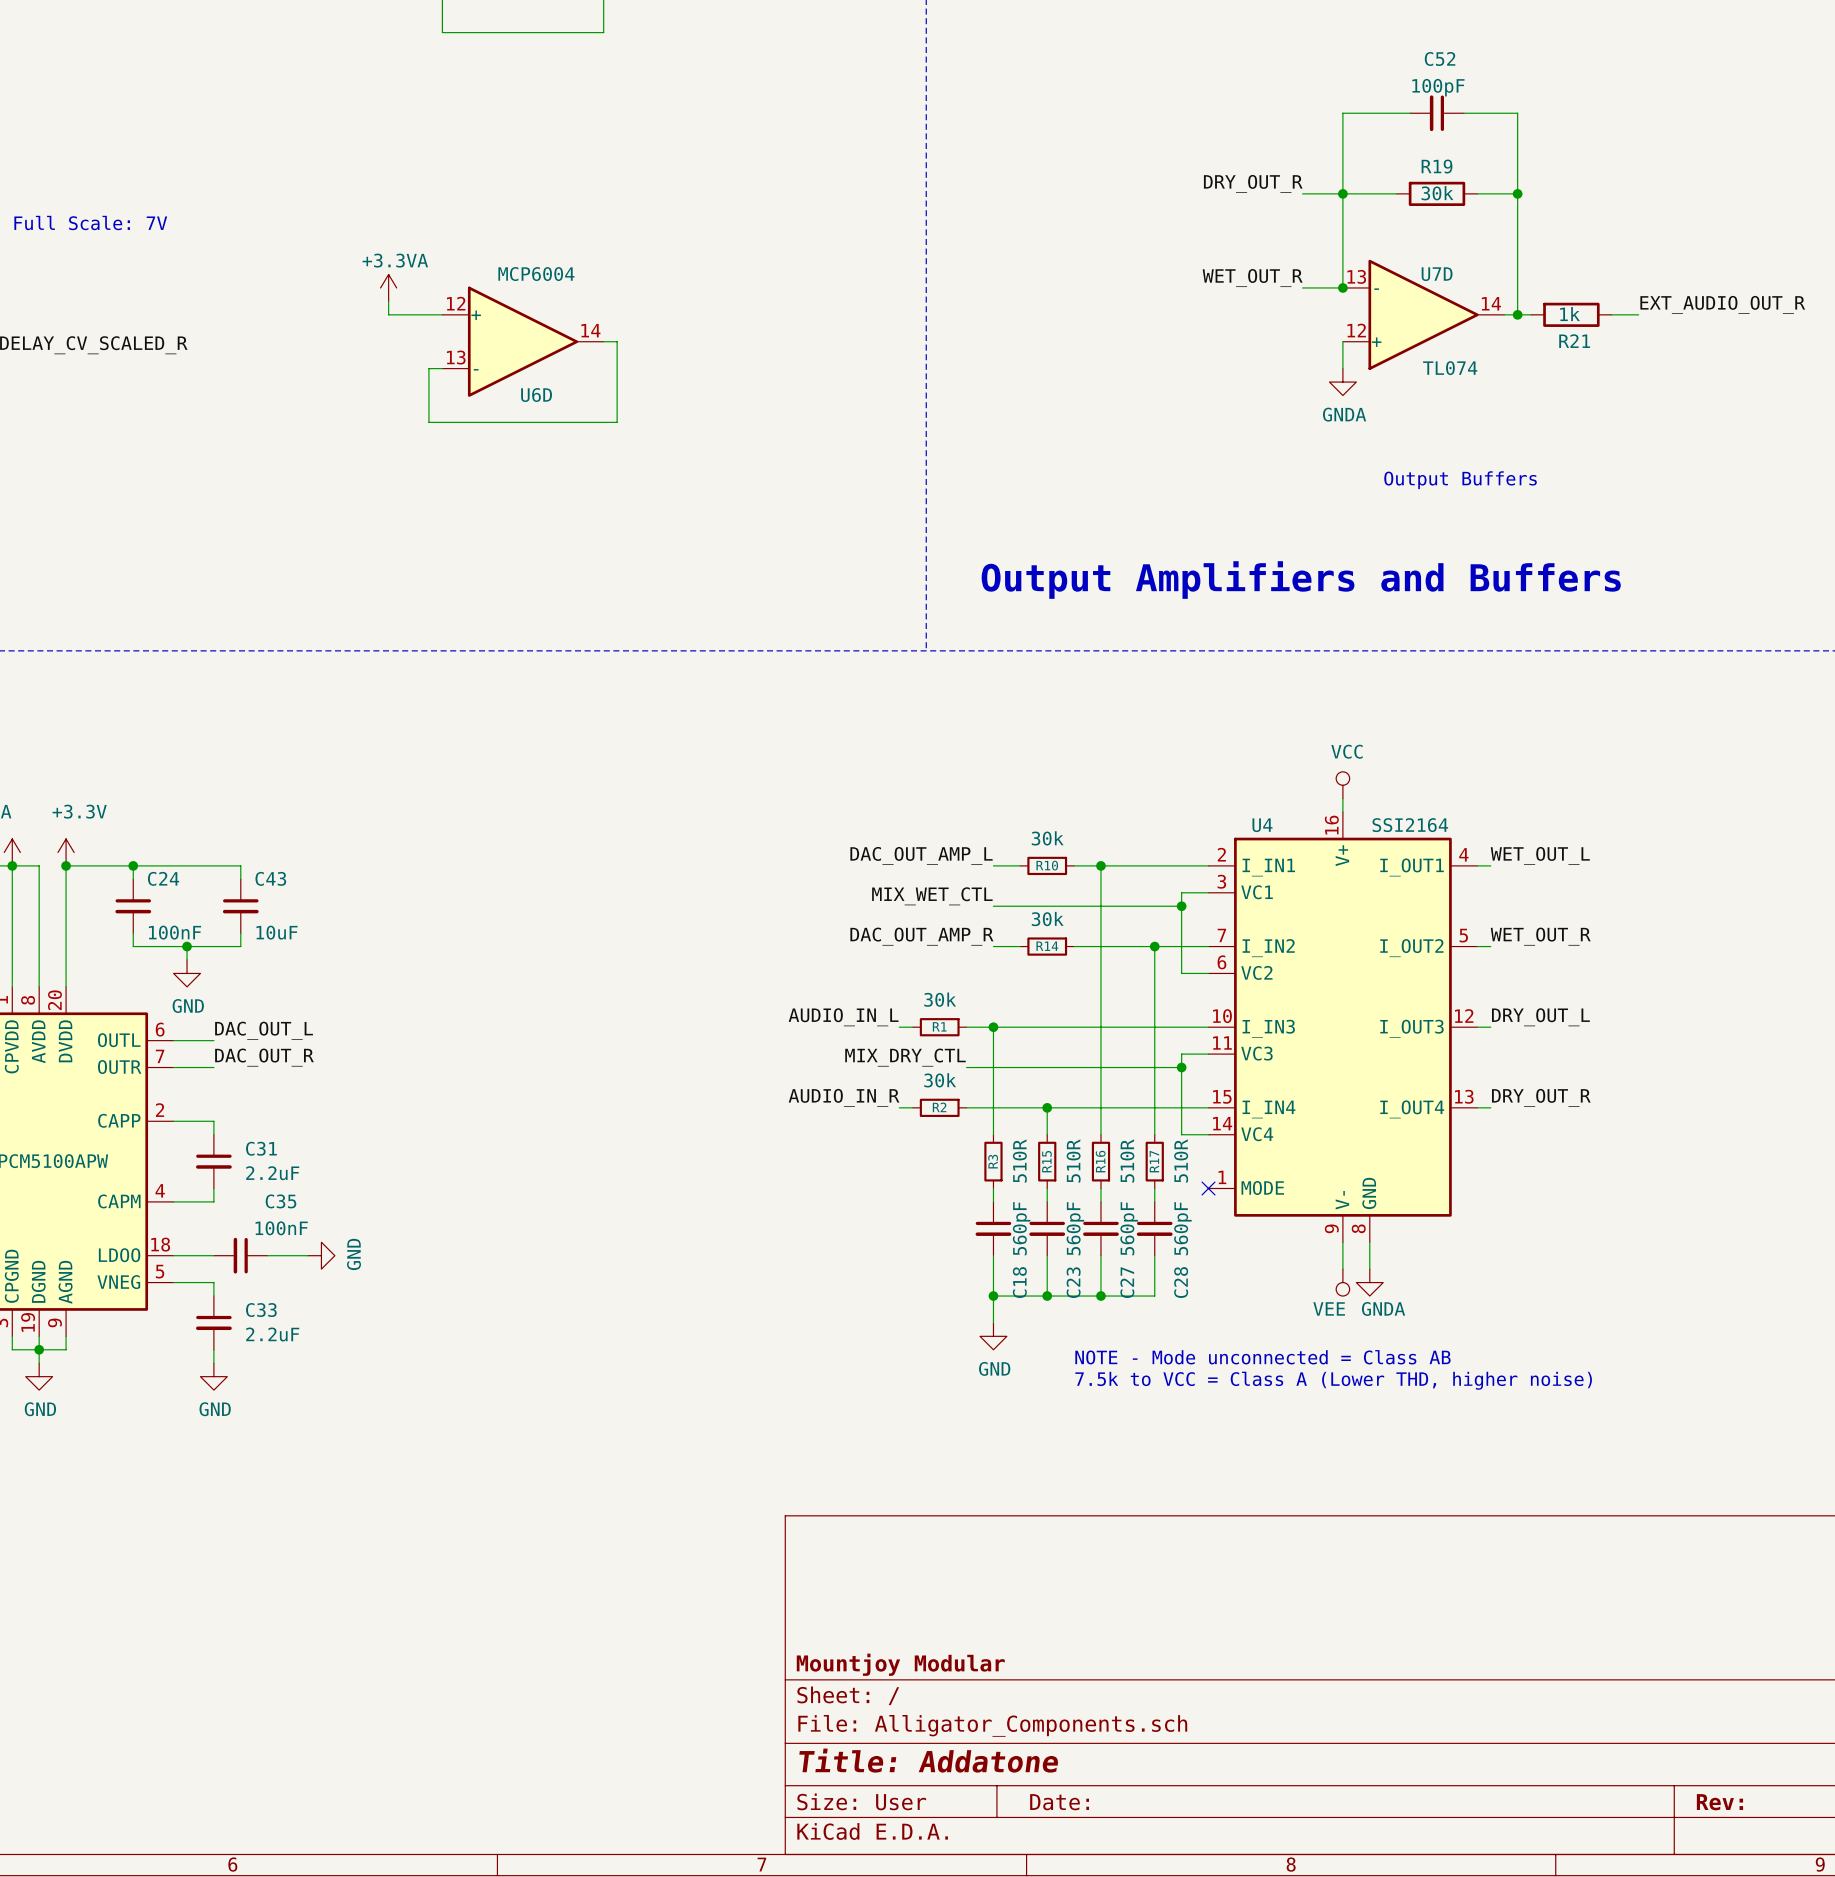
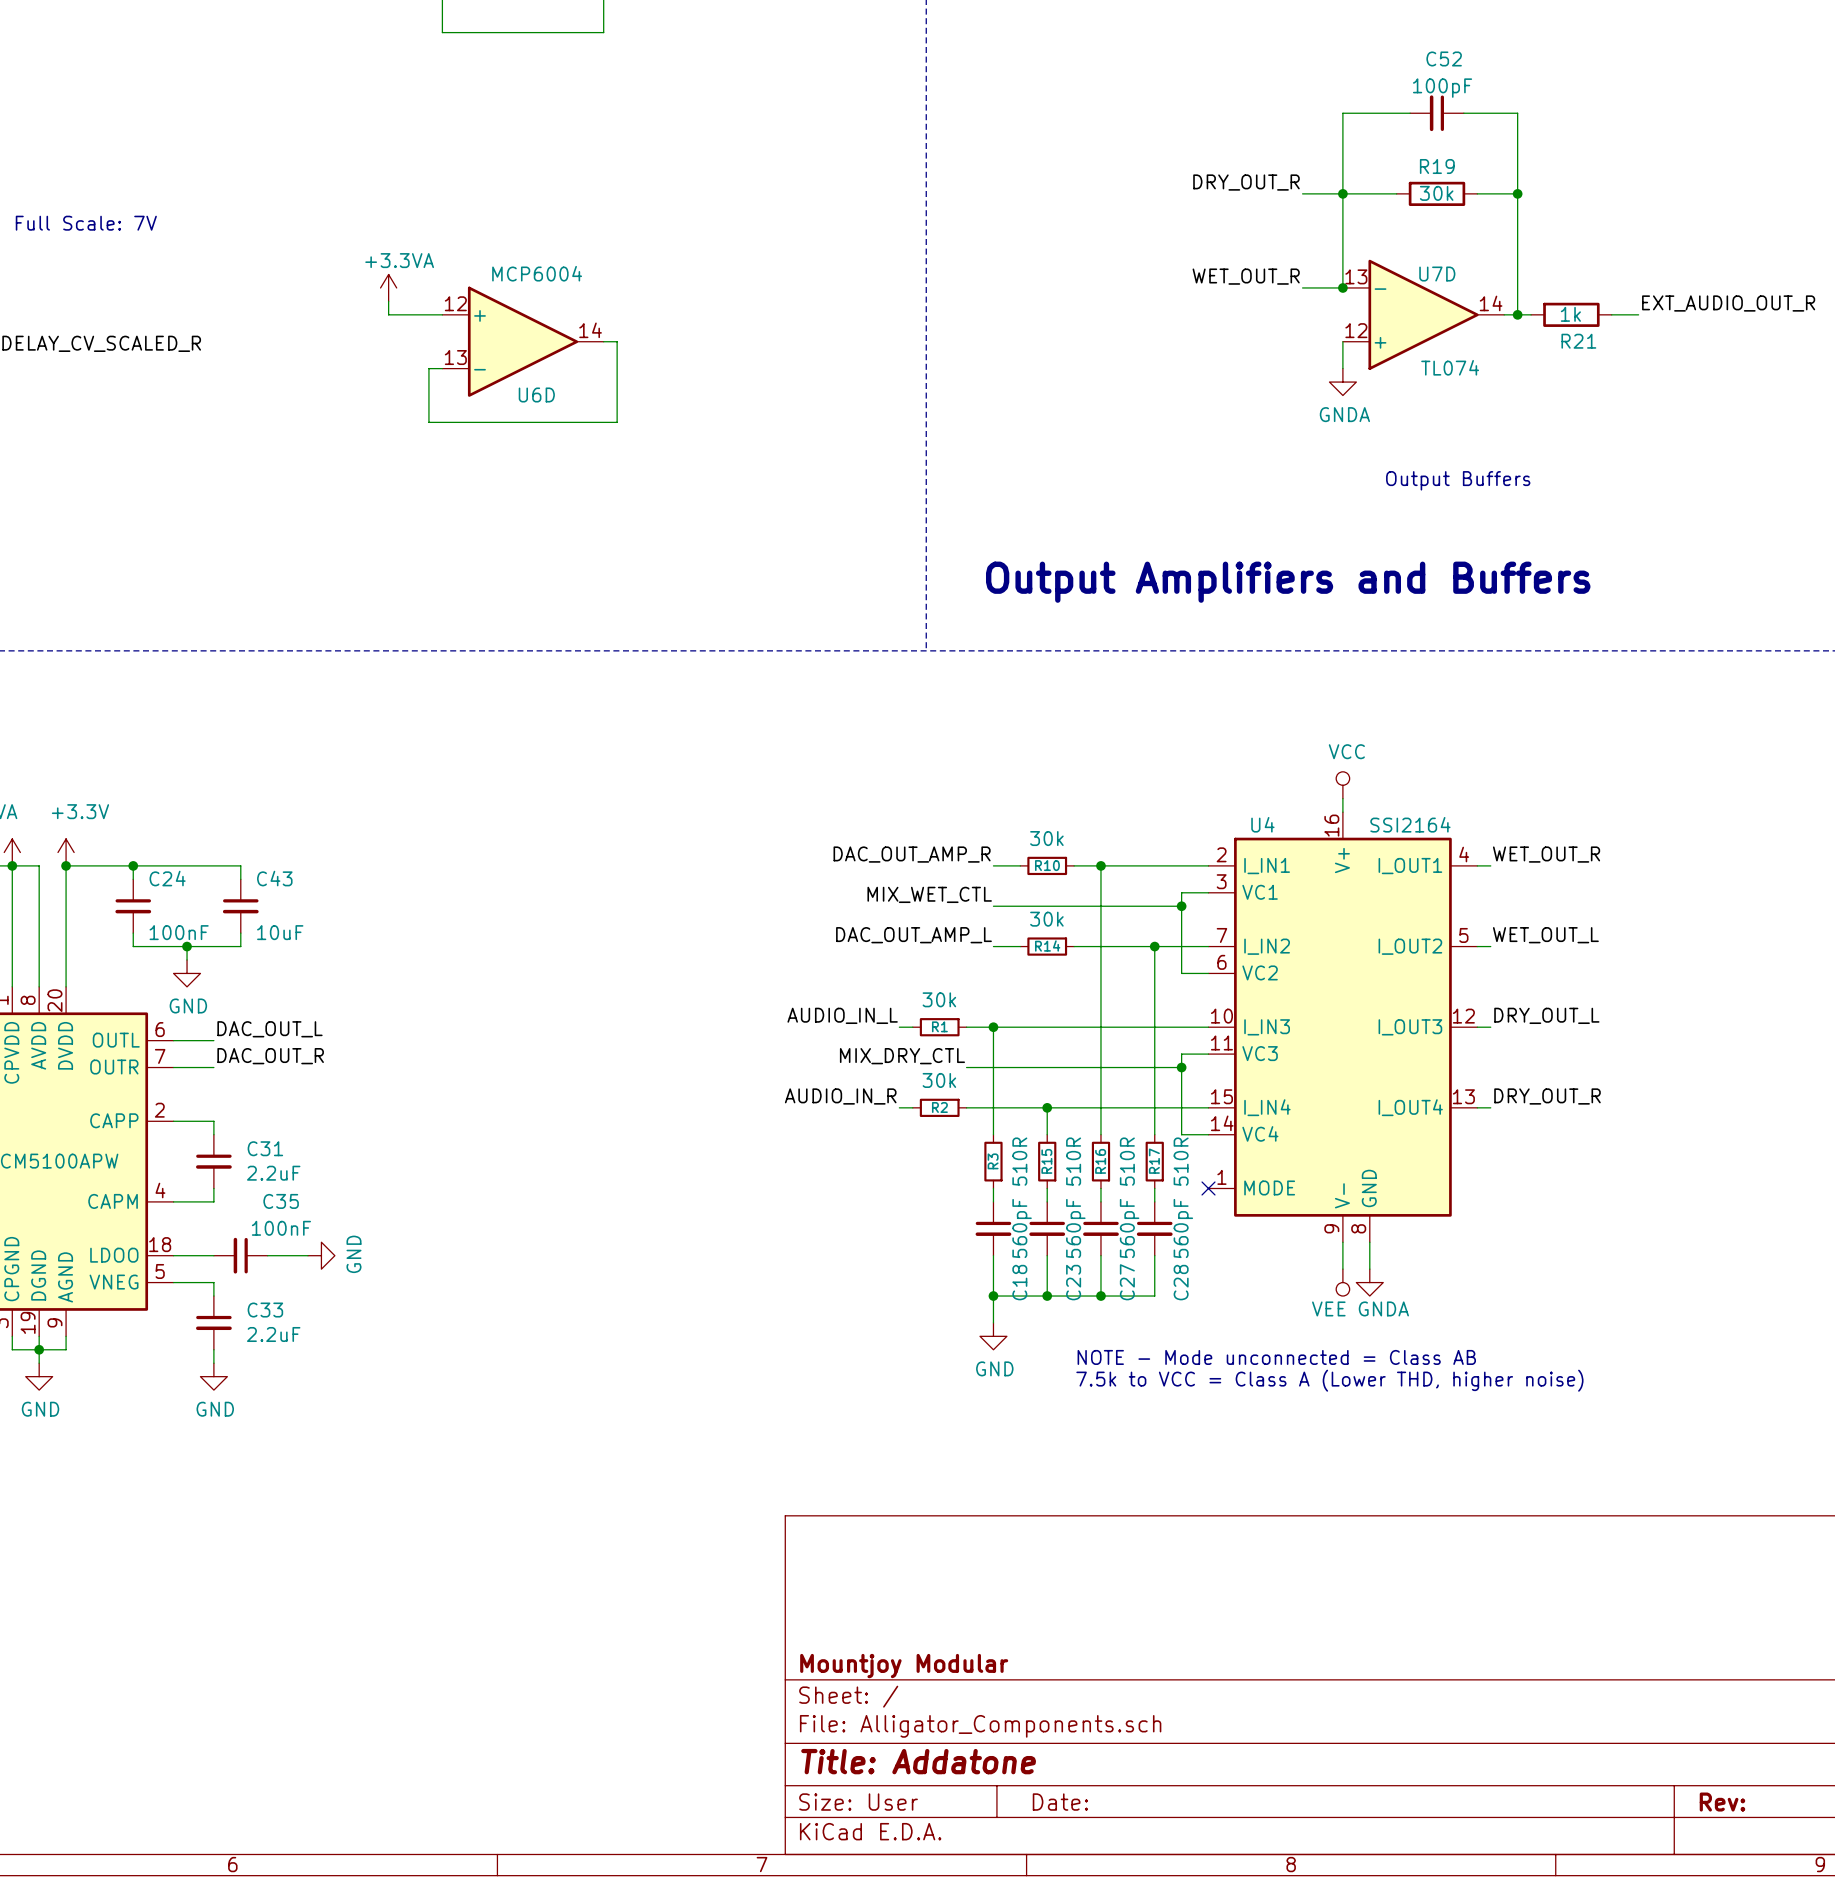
label: DAC_OUT_AMP_L (921, 855) -> DAC_OUT_AMP_R (912, 854)
label: WET_OUT_L (1540, 855) -> WET_OUT_R (1546, 854)
label: DAC_OUT_AMP_R (921, 936) -> DAC_OUT_AMP_L (913, 935)
label: WET_OUT_R (1540, 936) -> WET_OUT_L (1545, 935)

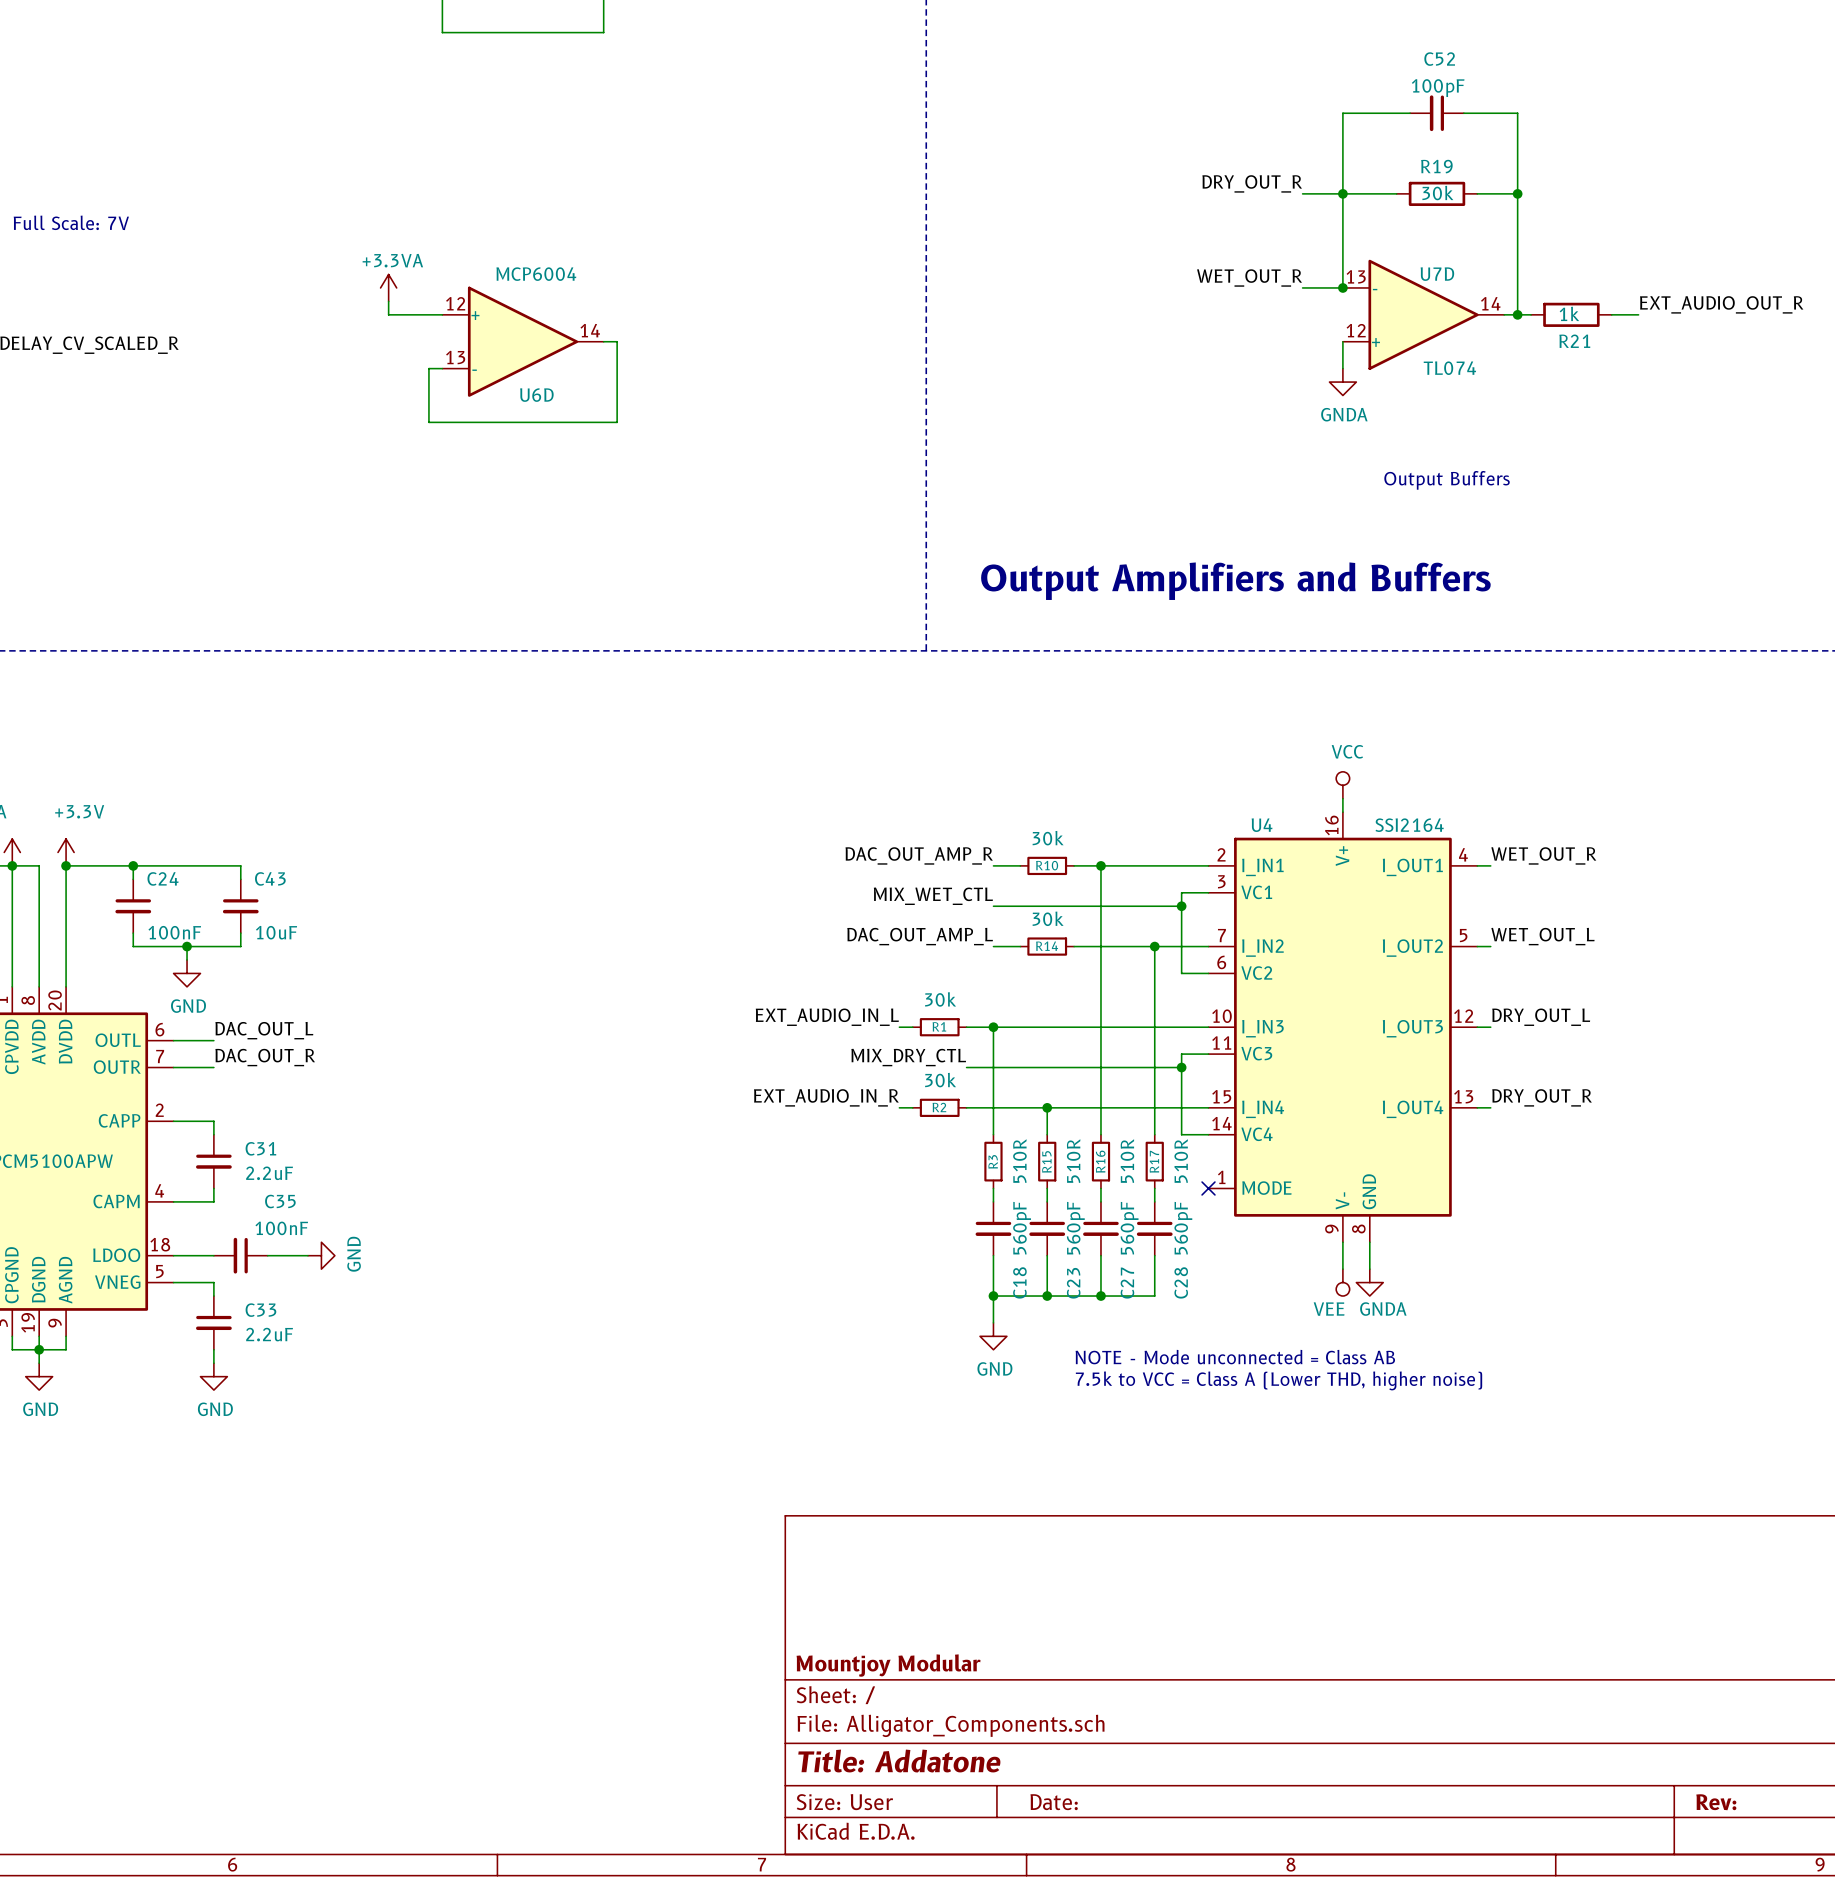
label: AUDIO_IN_L (842, 1015) -> EXT_AUDIO_IN_L (827, 1017)
label: AUDIO_IN_R (840, 1096) -> EXT_AUDIO_IN_R (826, 1097)

